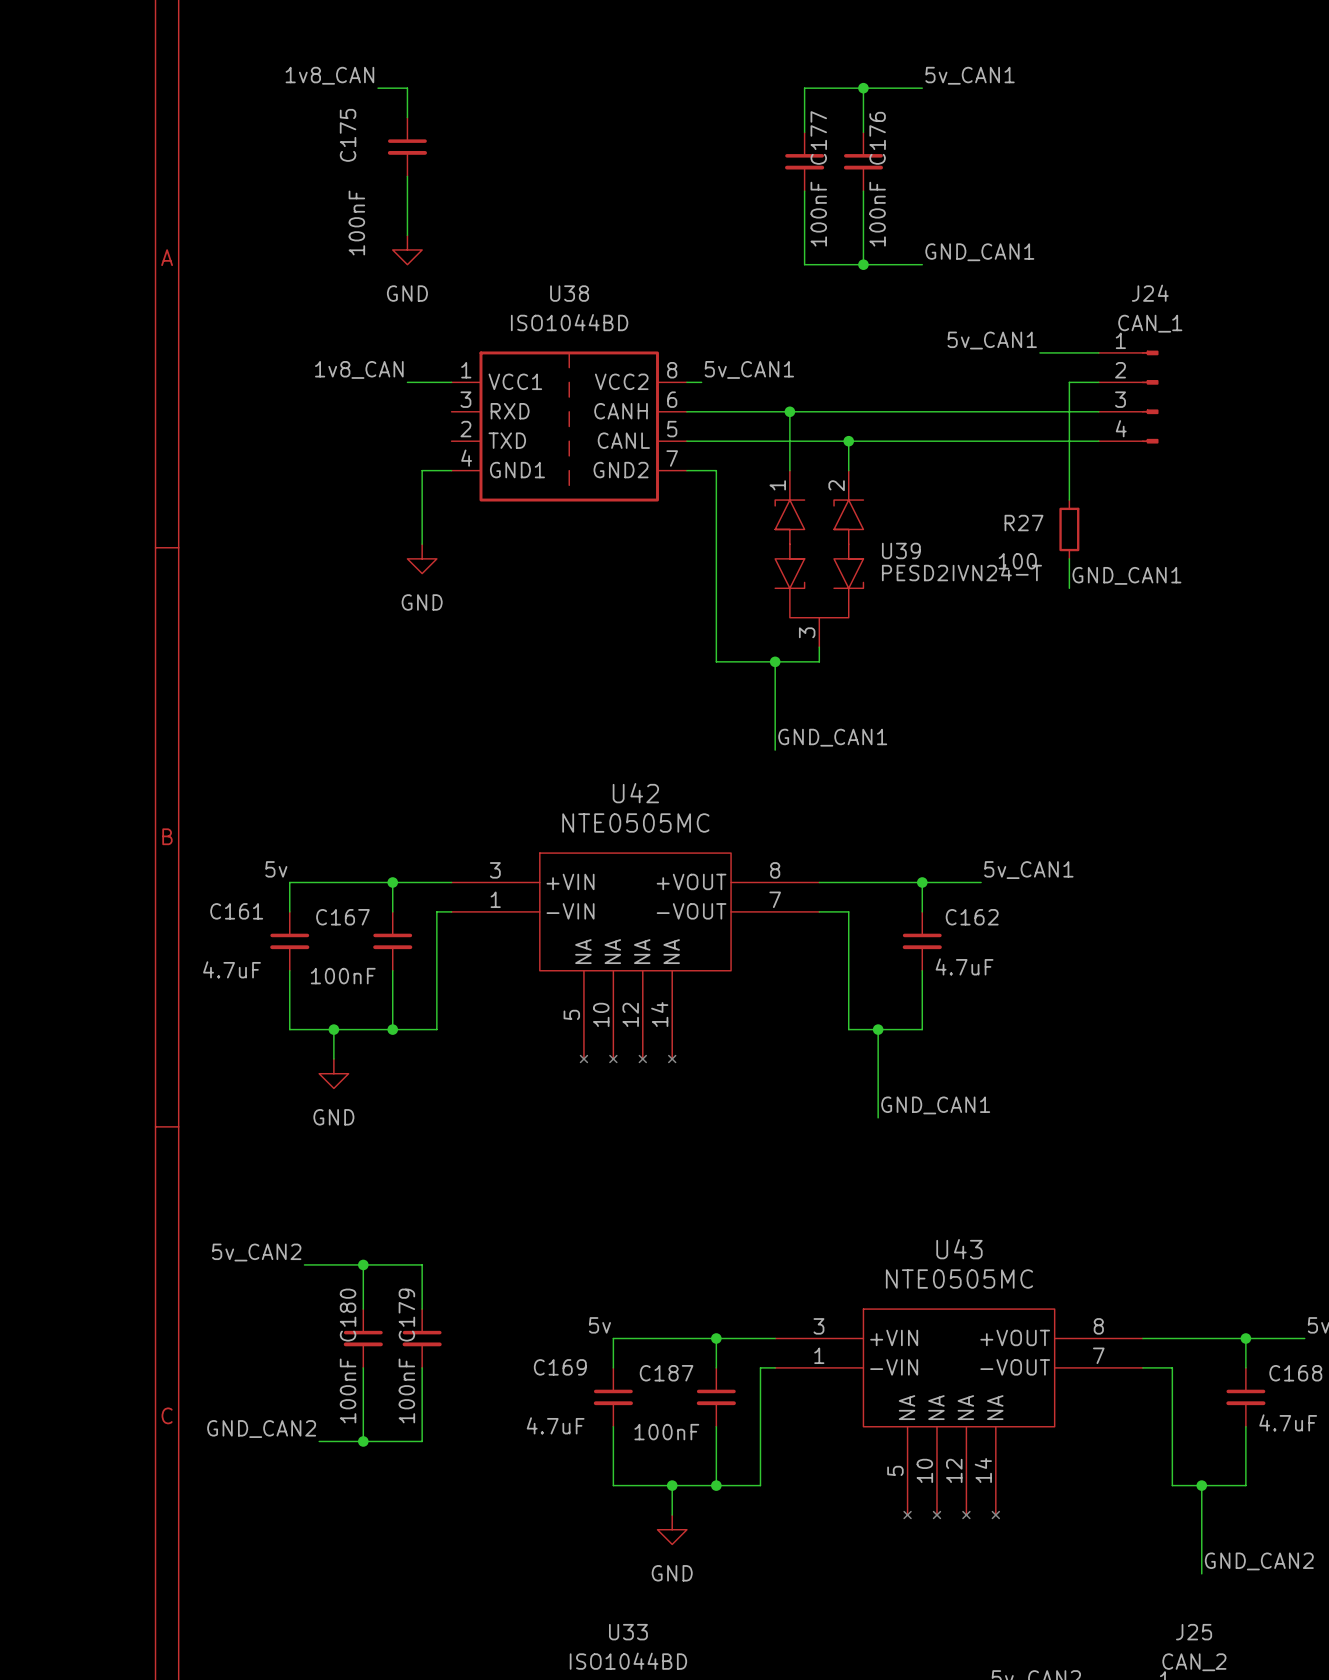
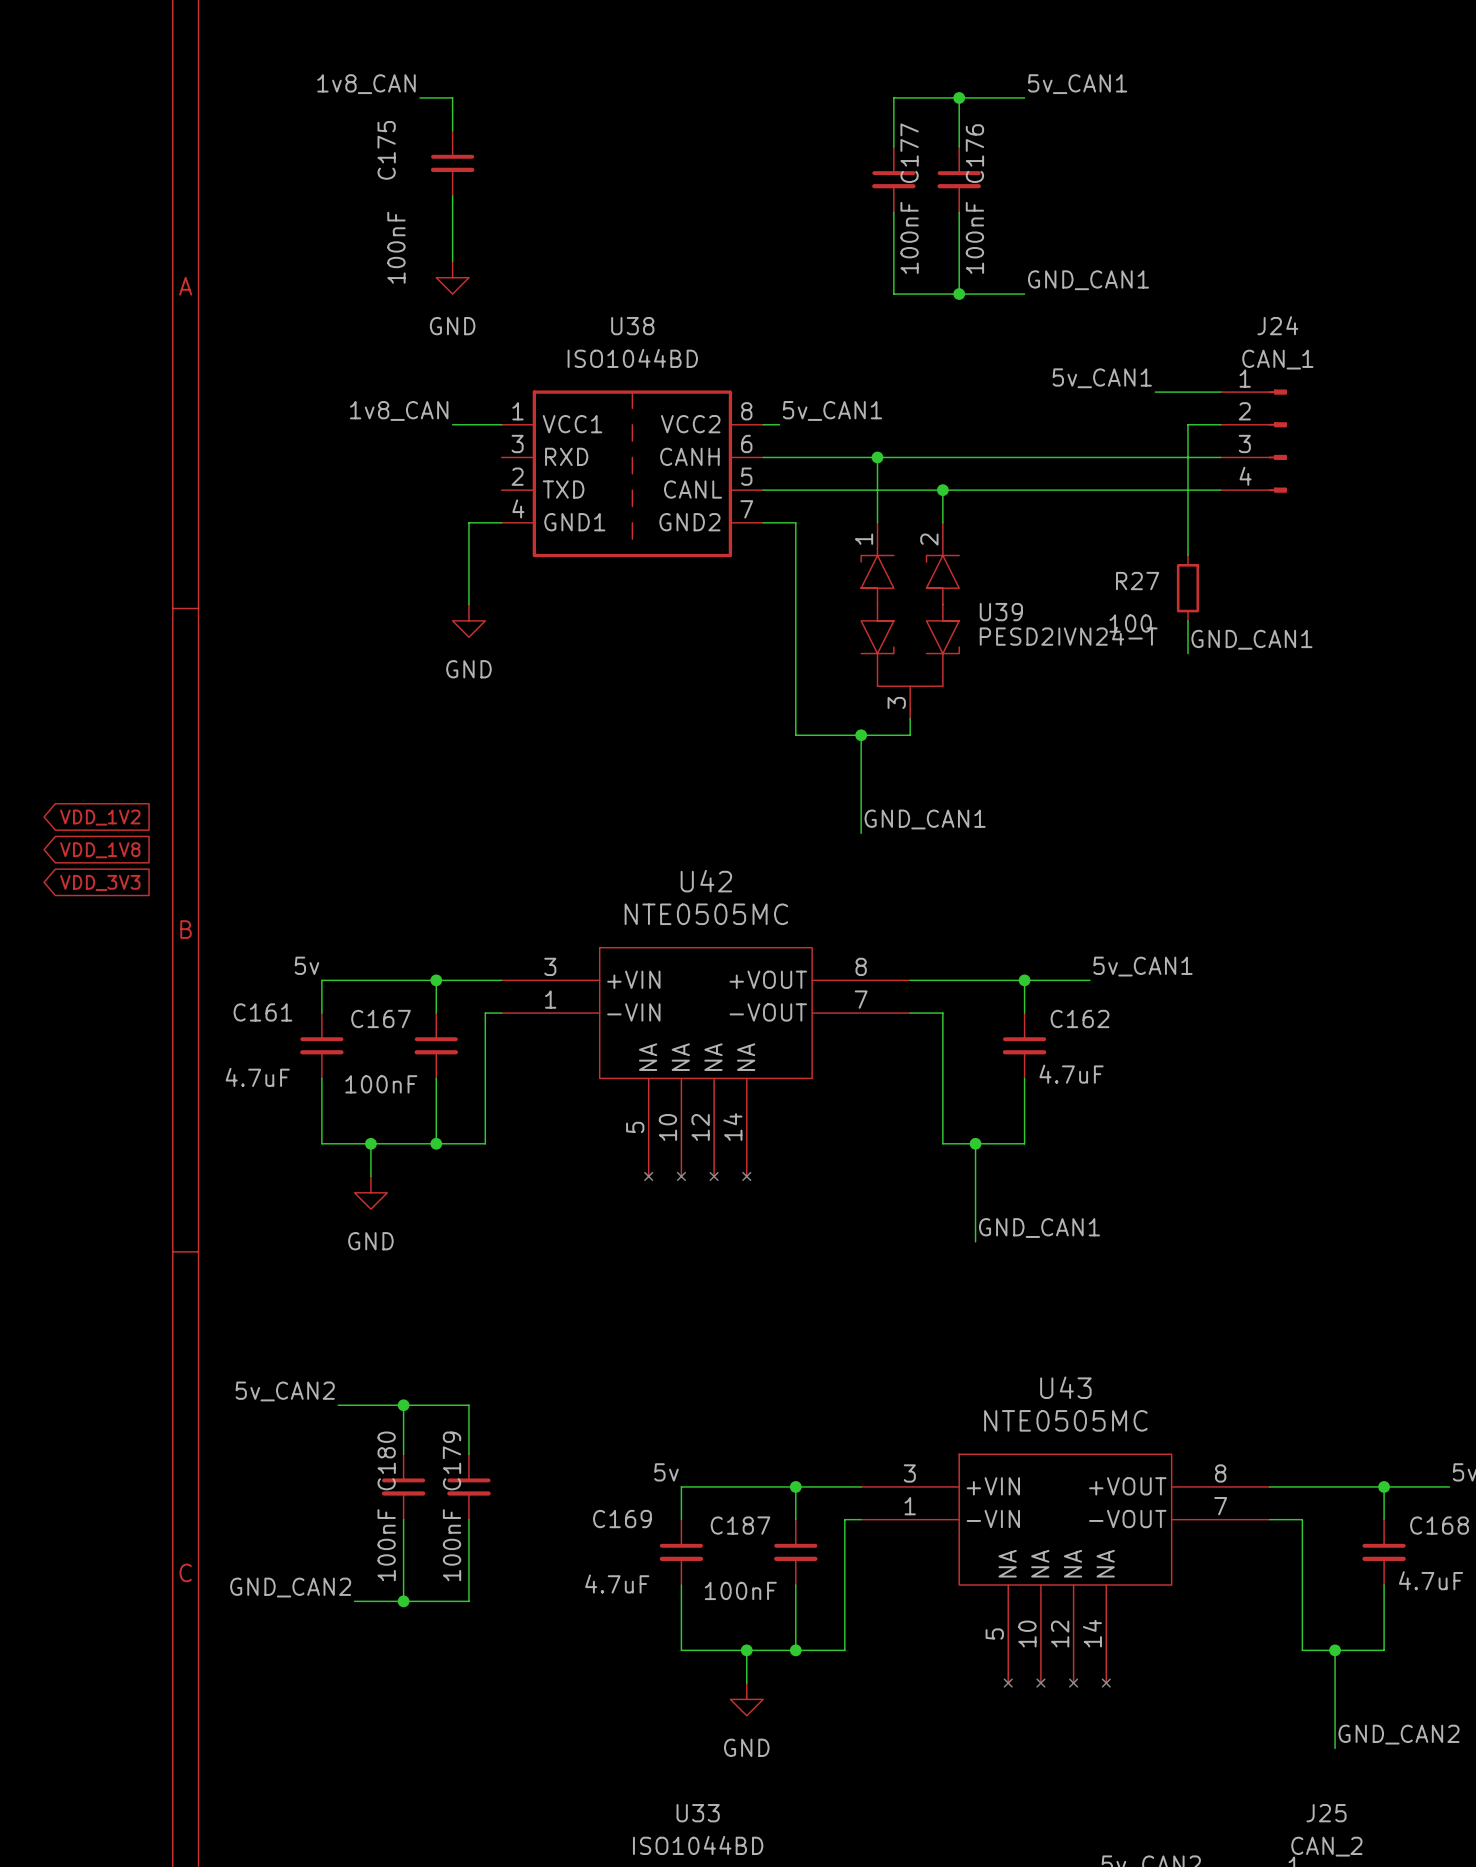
global label: none -> VDD_1V2 (100, 817)
global label: none -> VDD_1V8 (100, 850)
global label: none -> VDD_3V3 (100, 882)

